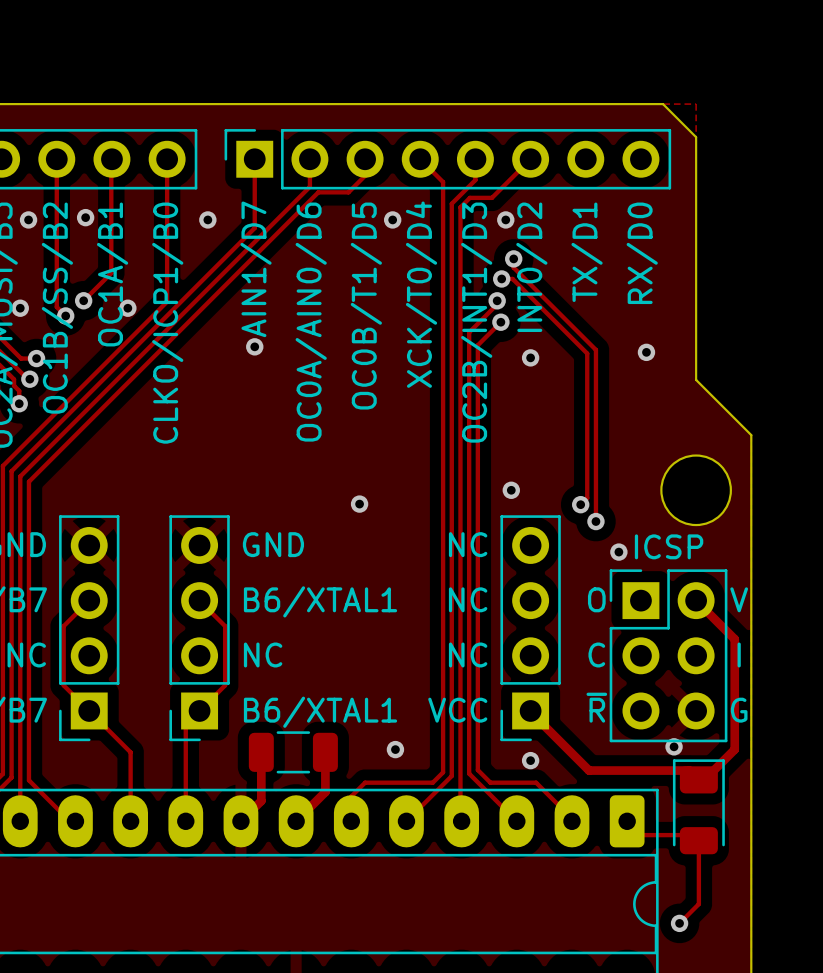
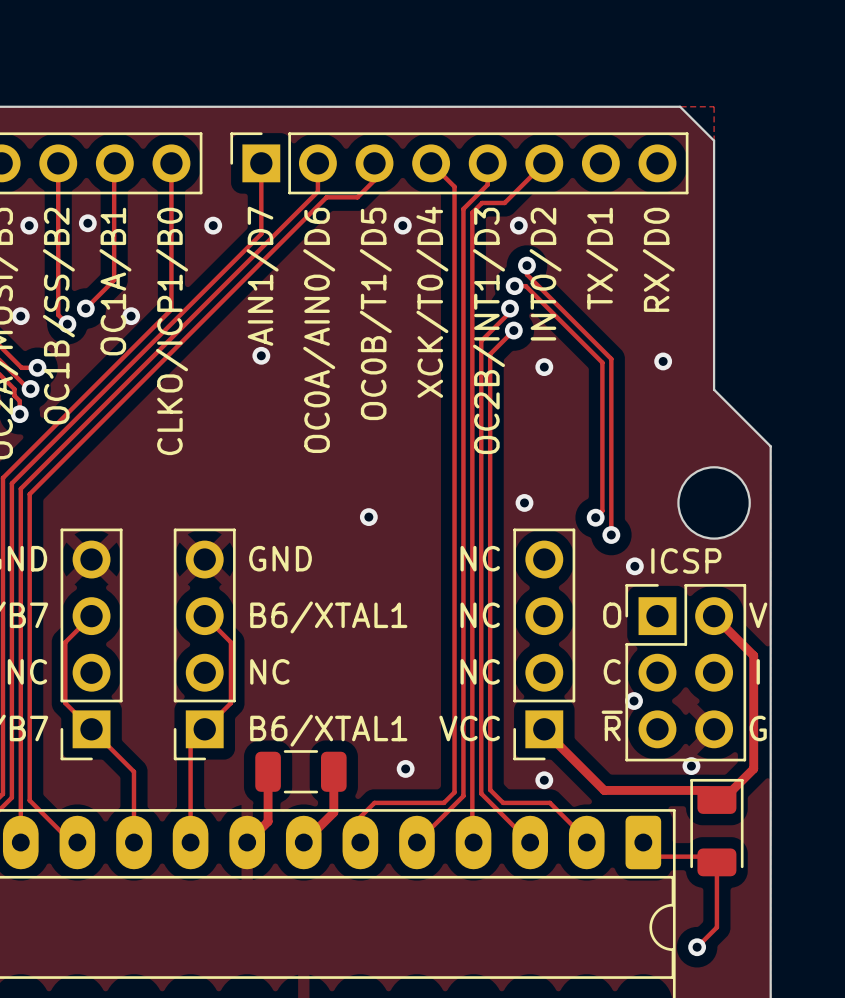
via: none -> (634, 701)

